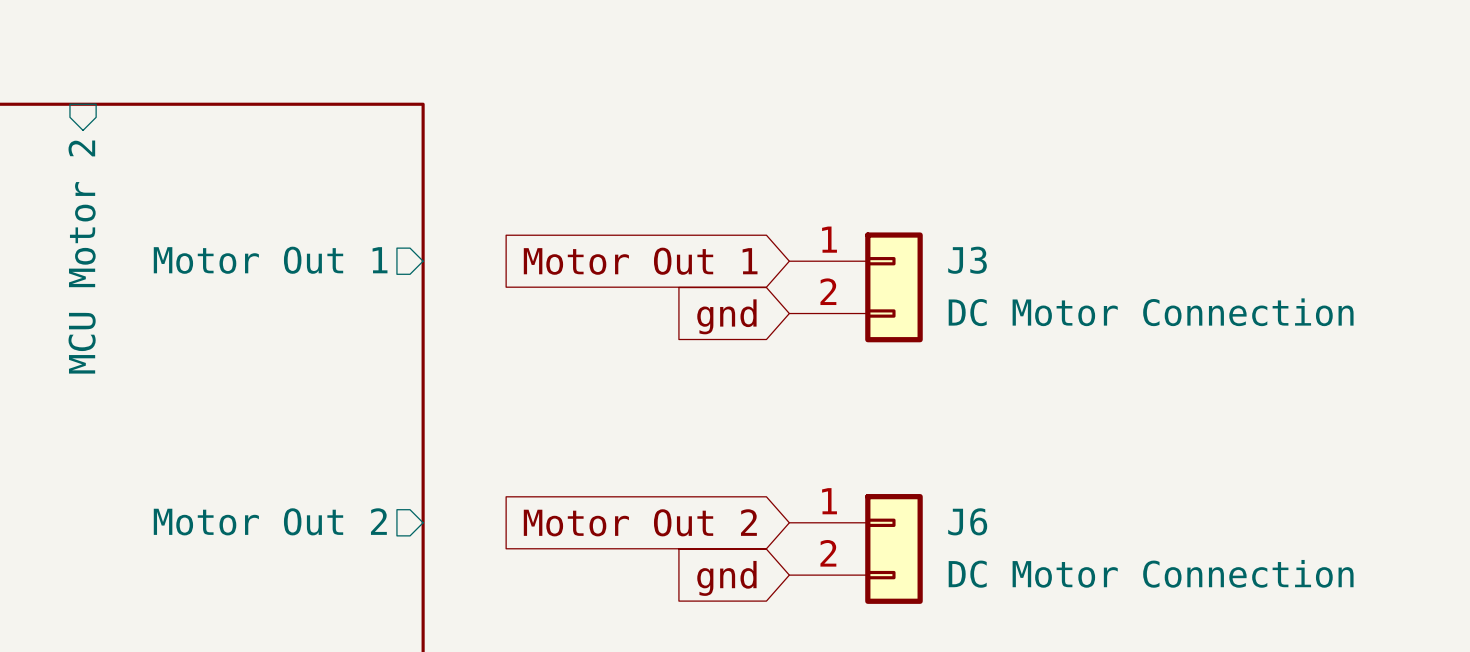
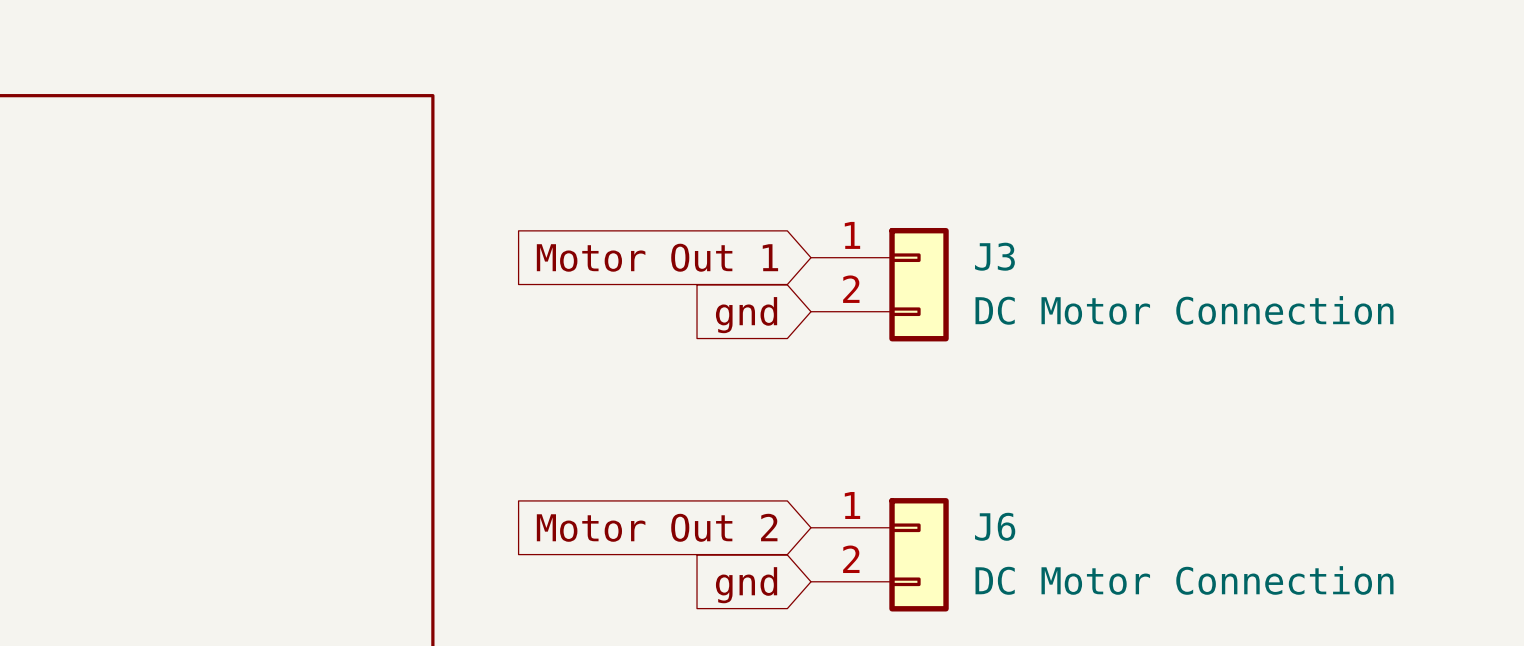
sheet pin: MCU Motor 2 (82, 257) -> none
sheet pin: Motor Out 1 (270, 260) -> none
sheet pin: Motor Out 2 (270, 521) -> none

